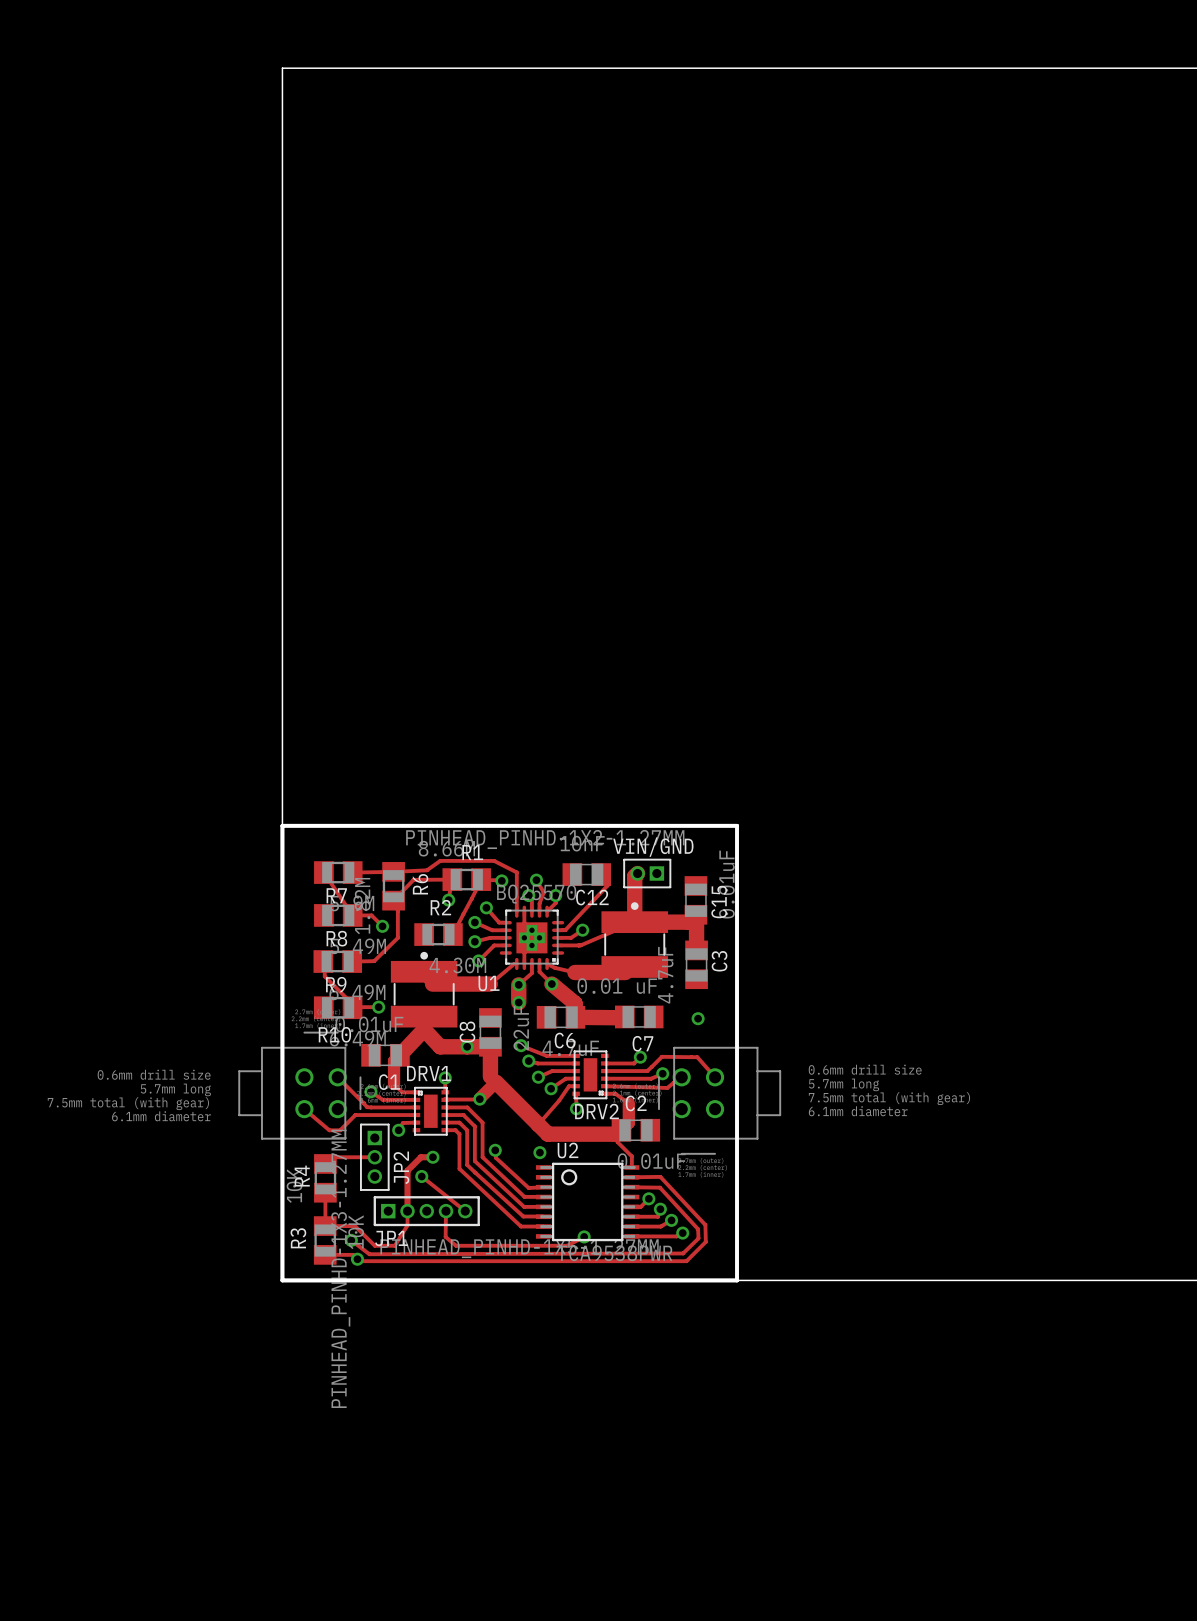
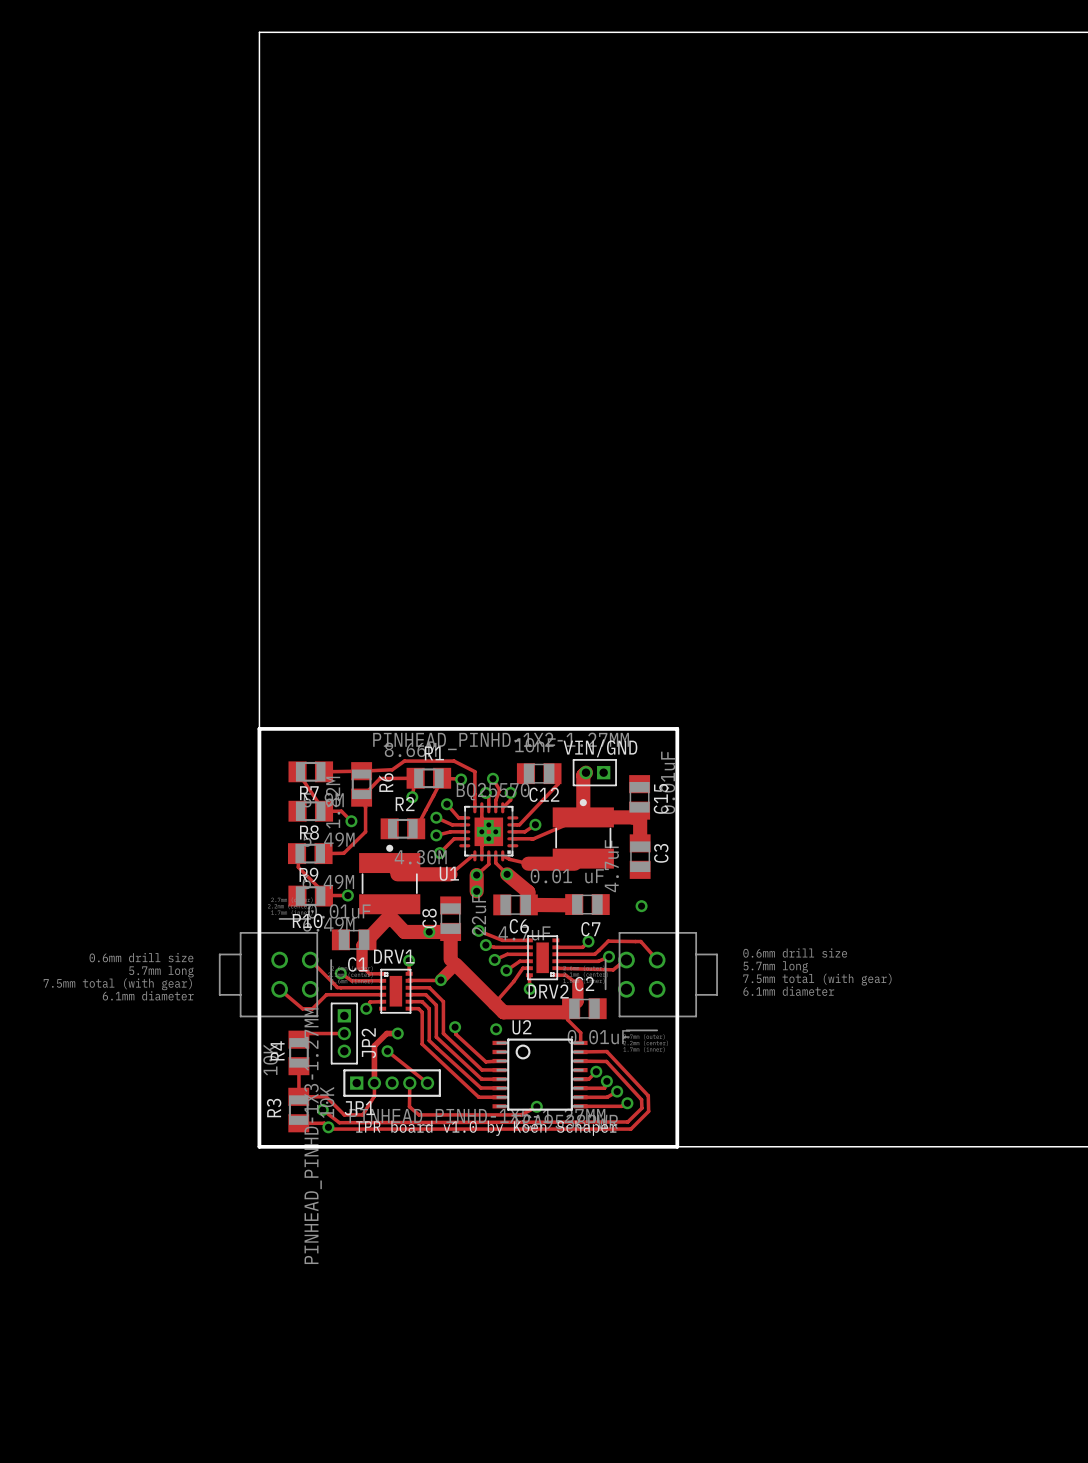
text: none -> IPR board v1.0 by Koen Schaper (486, 1128)

